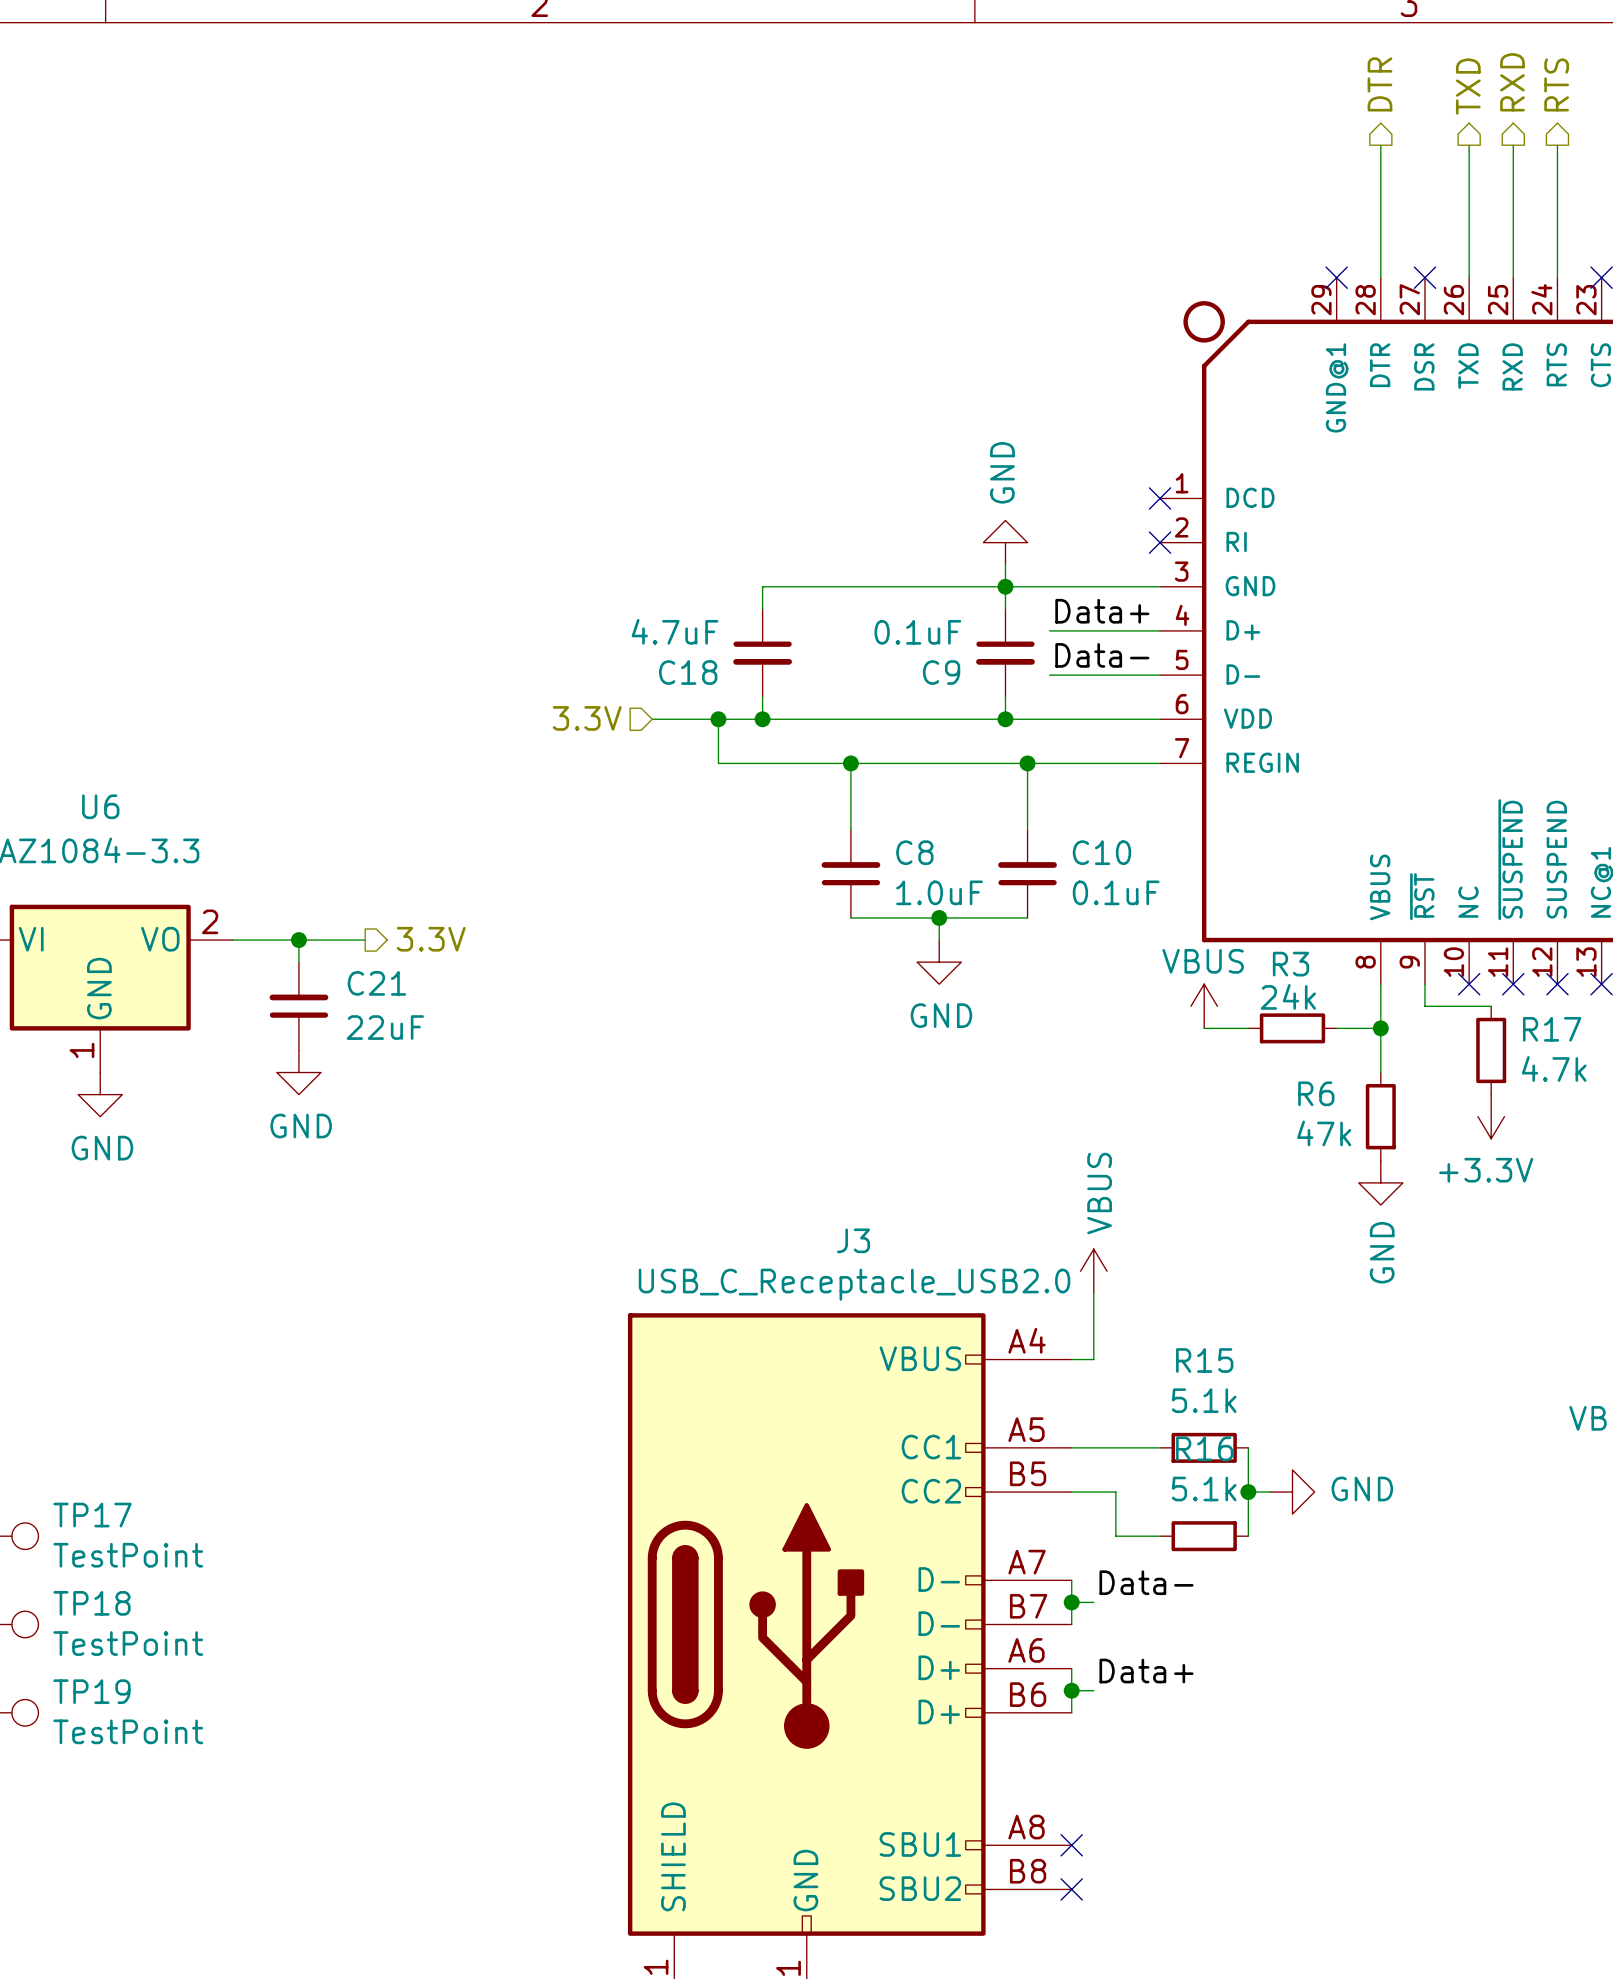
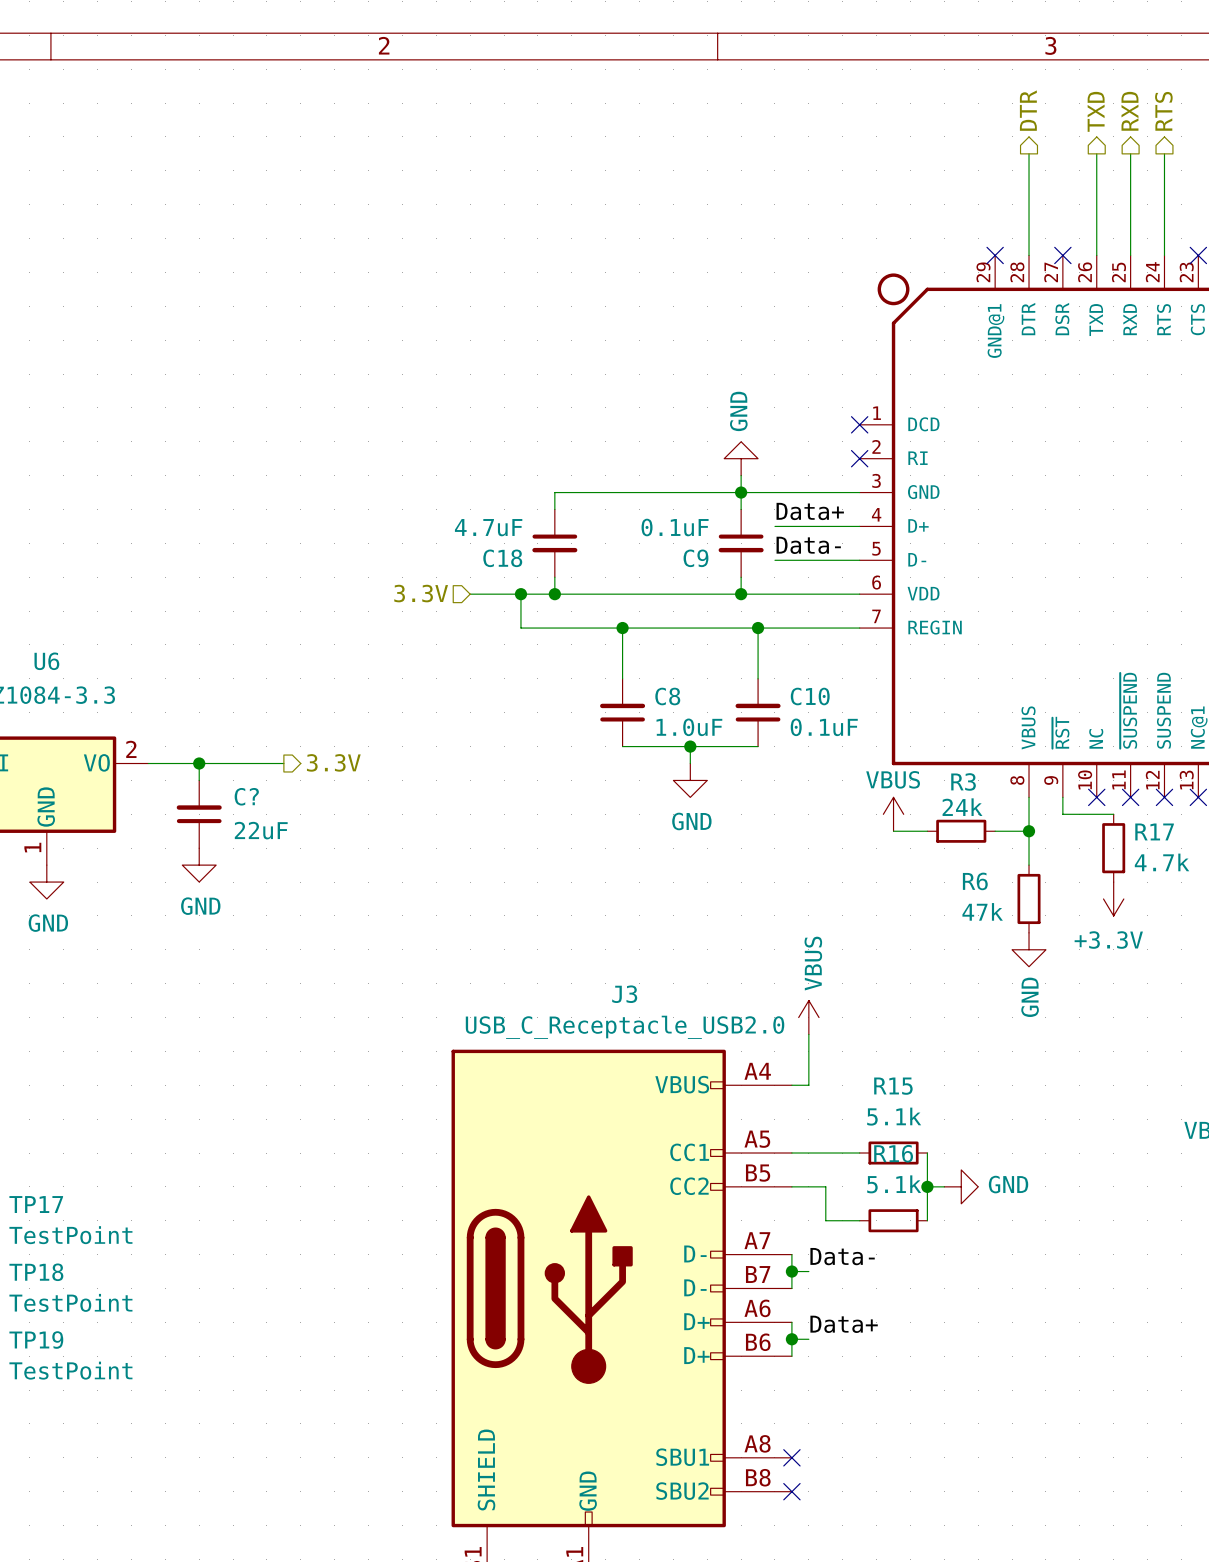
hierarchical label position: 3.3V (431, 939) -> 3.3V (333, 762)
wire: none -> (250, 763) (283, 763)
C21 name: C21 (376, 983) -> C? (246, 796)

